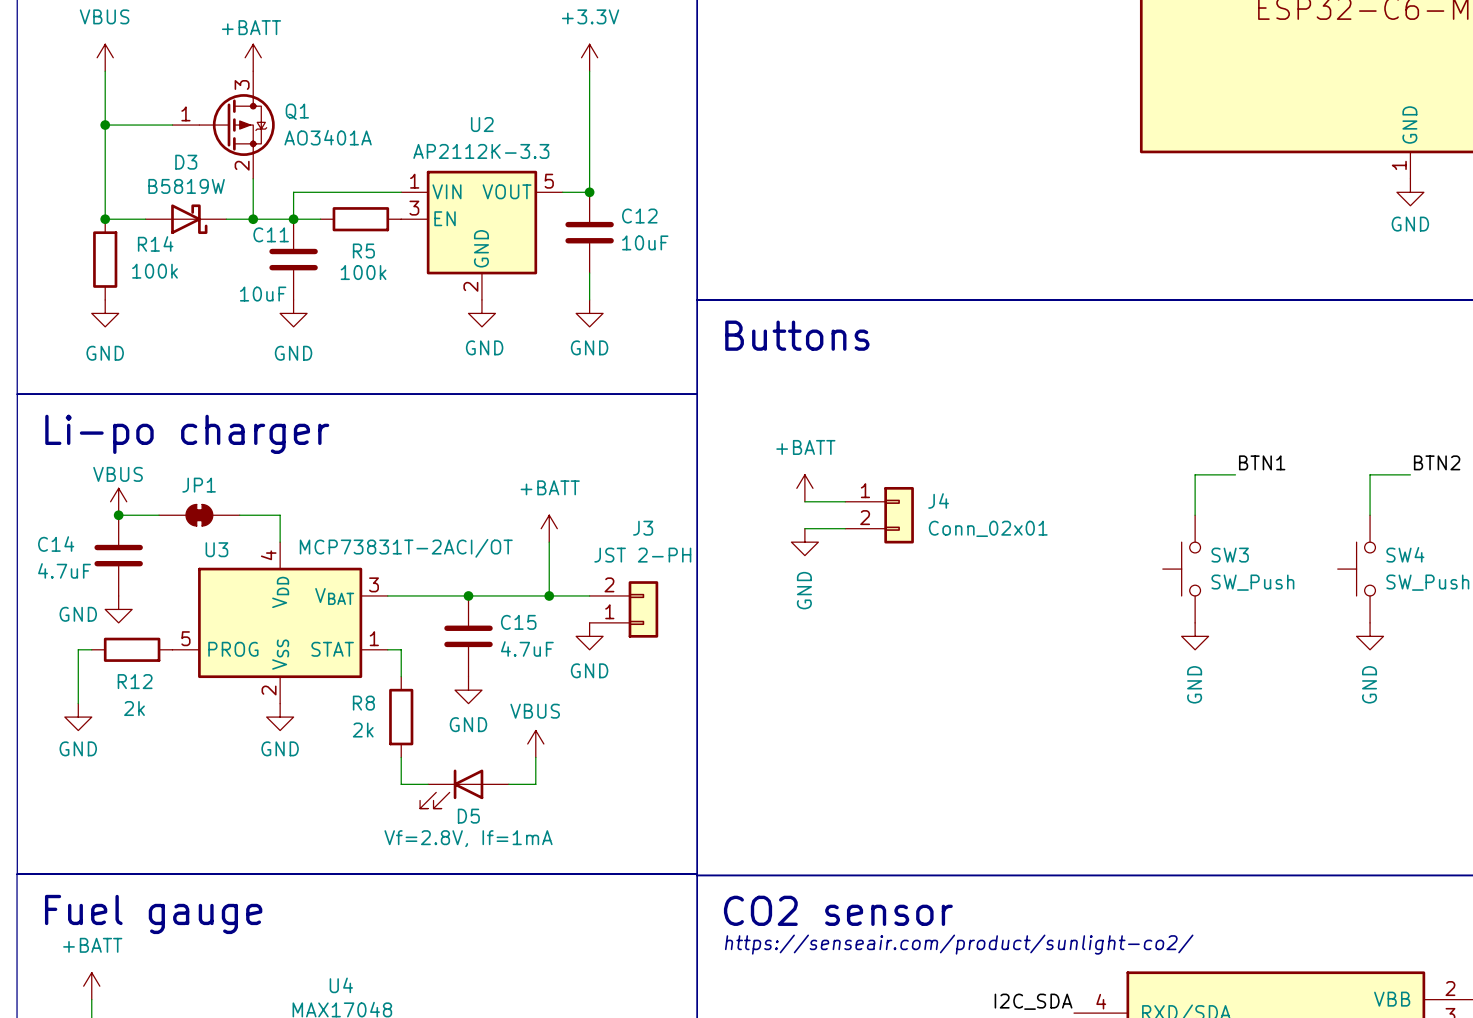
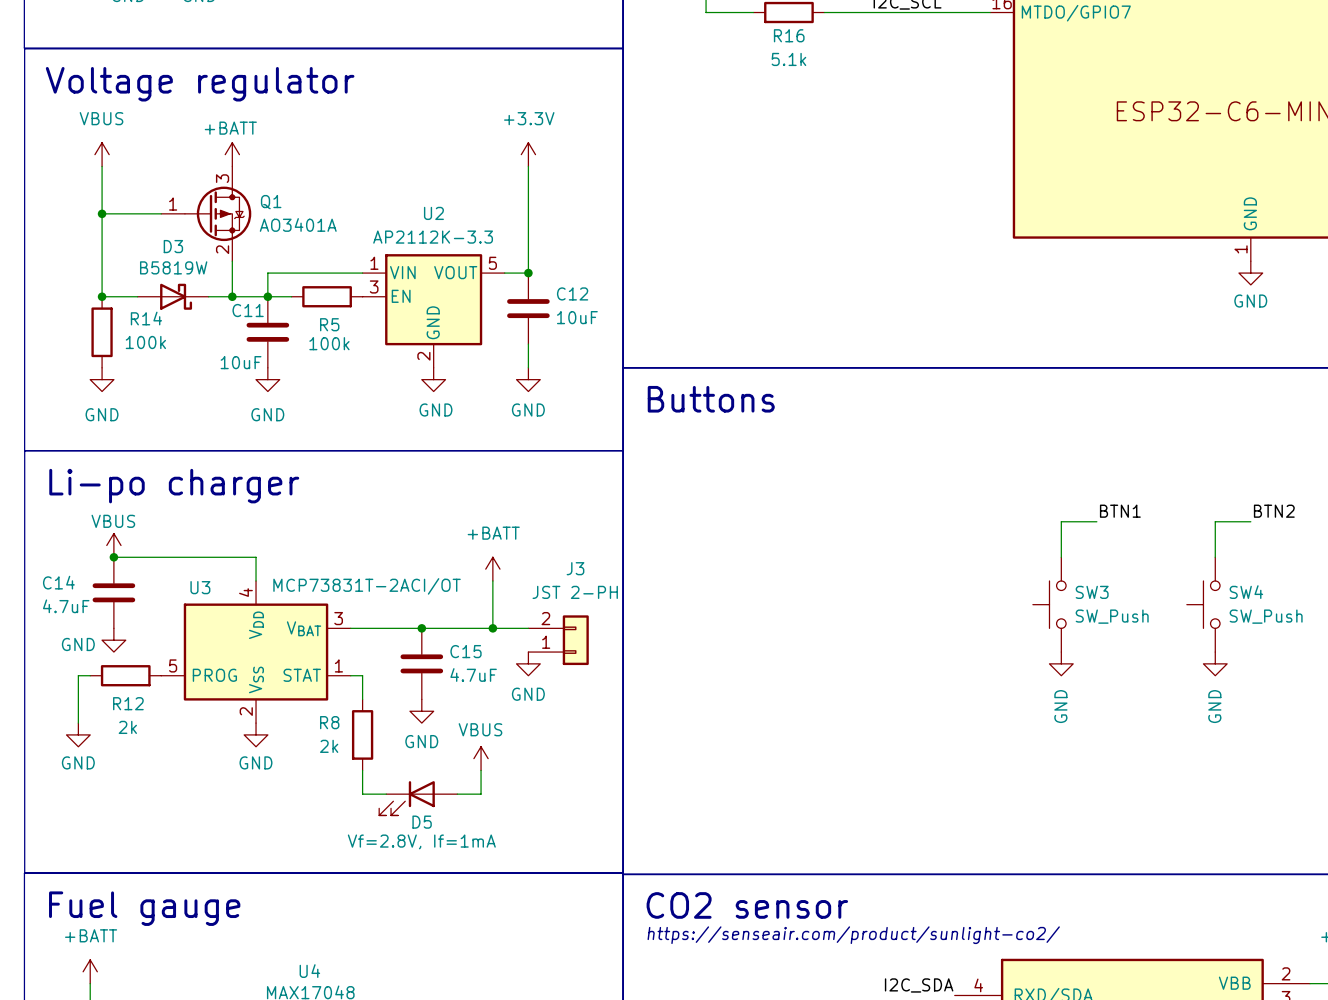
power symbol: +BATT (804, 488) -> none
wire: (804, 501) (845, 501) -> none
JP1: (199, 515) -> none
J4: Conn_02x01 (879, 515) -> none
wire: (804, 528) (845, 528) -> none
power symbol: GND (804, 542) -> none

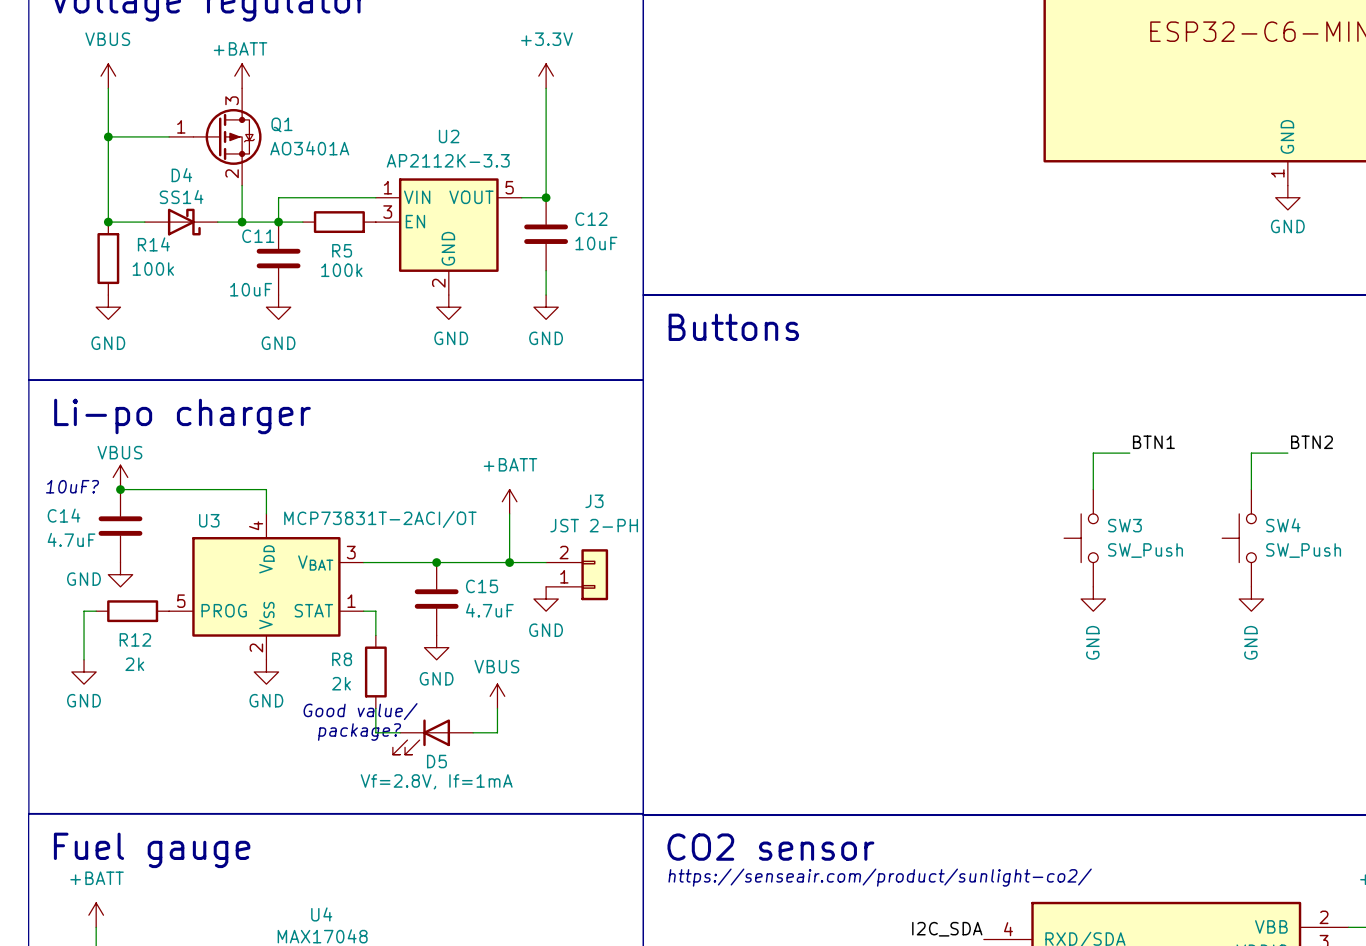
D3 name: D3 (173, 246) -> D4 (181, 175)
D3 value: B5819W (173, 267) -> SS14 (181, 197)
text: none -> 10uF? (72, 486)
text: none -> Good value/ (360, 711)
text: none -> package? (359, 732)

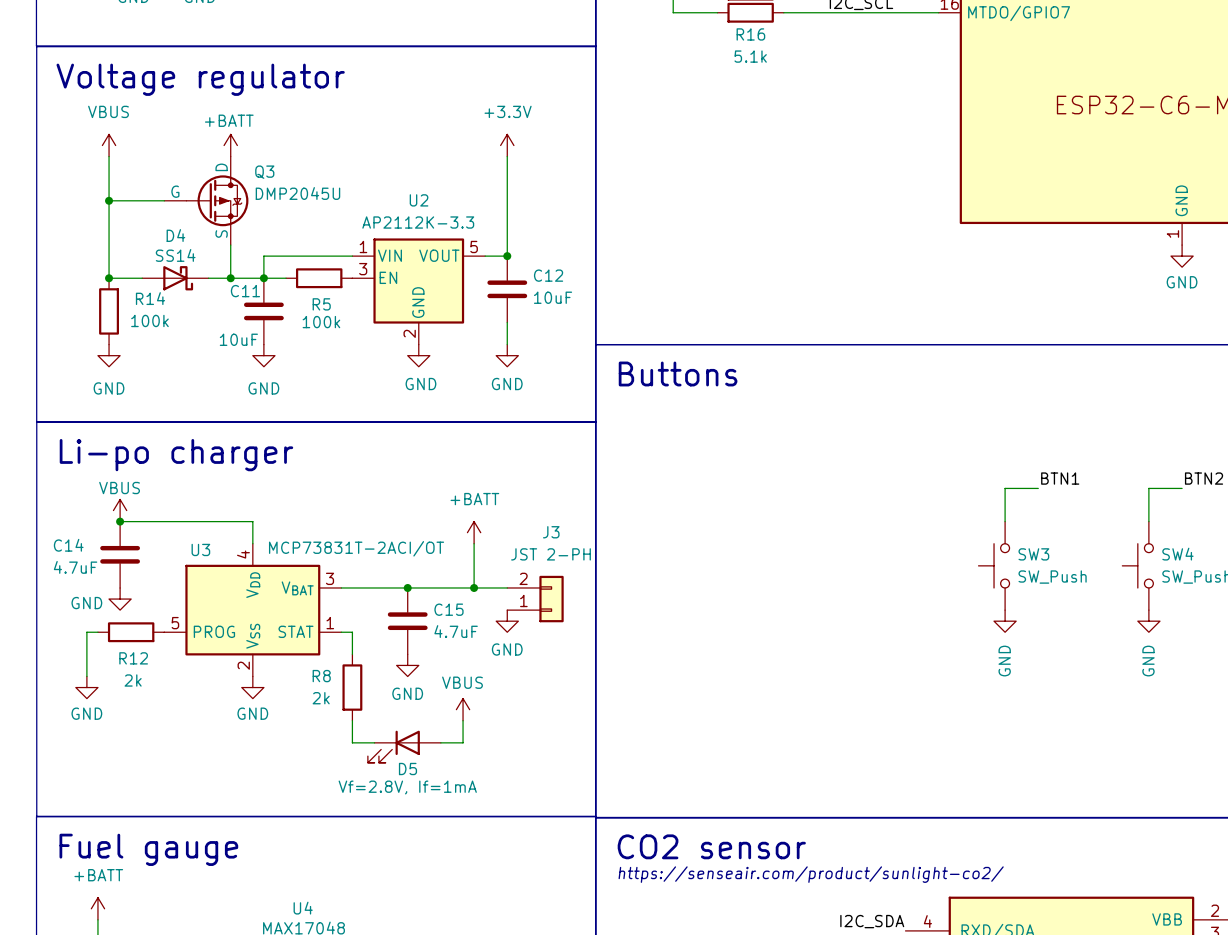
Q1 pin name: none -> D (221, 167)
Q1 pin number: 3 (232, 100) -> none
Q1 name: Q1 (281, 124) -> Q3 (264, 172)
Q1 pin name: none -> G (175, 191)
Q1 pin number: 1 (181, 126) -> none
Q1 value: AO3401A (309, 148) -> DMP2045U (297, 193)
Q1 pin name: none -> S (221, 233)
Q1 pin number: 2 (232, 173) -> none
text: 10uF? (72, 486) -> none
text: Good value/ (360, 711) -> none
text: package? (359, 732) -> none

